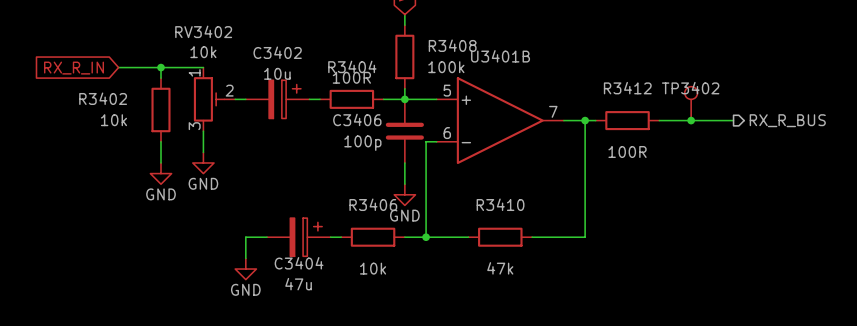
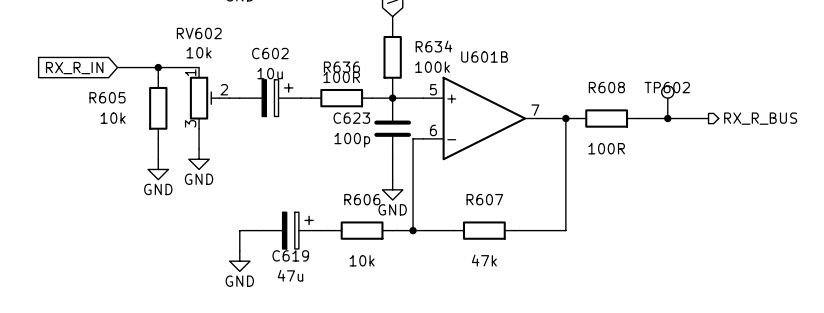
RV3402 name: RV3402 (203, 31) -> RV602 (199, 33)
R3408 name: R3408 (452, 45) -> R634 (433, 46)
C3402 name: C3402 (277, 52) -> C602 (270, 53)
U3401B name: U3401B (500, 56) -> U601B (484, 56)
R3404 name: R3404 (352, 66) -> R636 (341, 67)
R3412 name: R3412 (627, 88) -> R608 (606, 87)
TP3402 name: TP3402 (690, 88) -> TP602 (667, 87)
R3402 name: R3402 (103, 98) -> R605 (107, 97)
C3406 name: C3406 (357, 119) -> C623 (351, 118)
R3406 name: R3406 (373, 204) -> R606 (362, 199)
R3410 name: R3410 (500, 204) -> R607 (484, 199)
C3404 name: C3404 (299, 263) -> C619 (290, 255)

